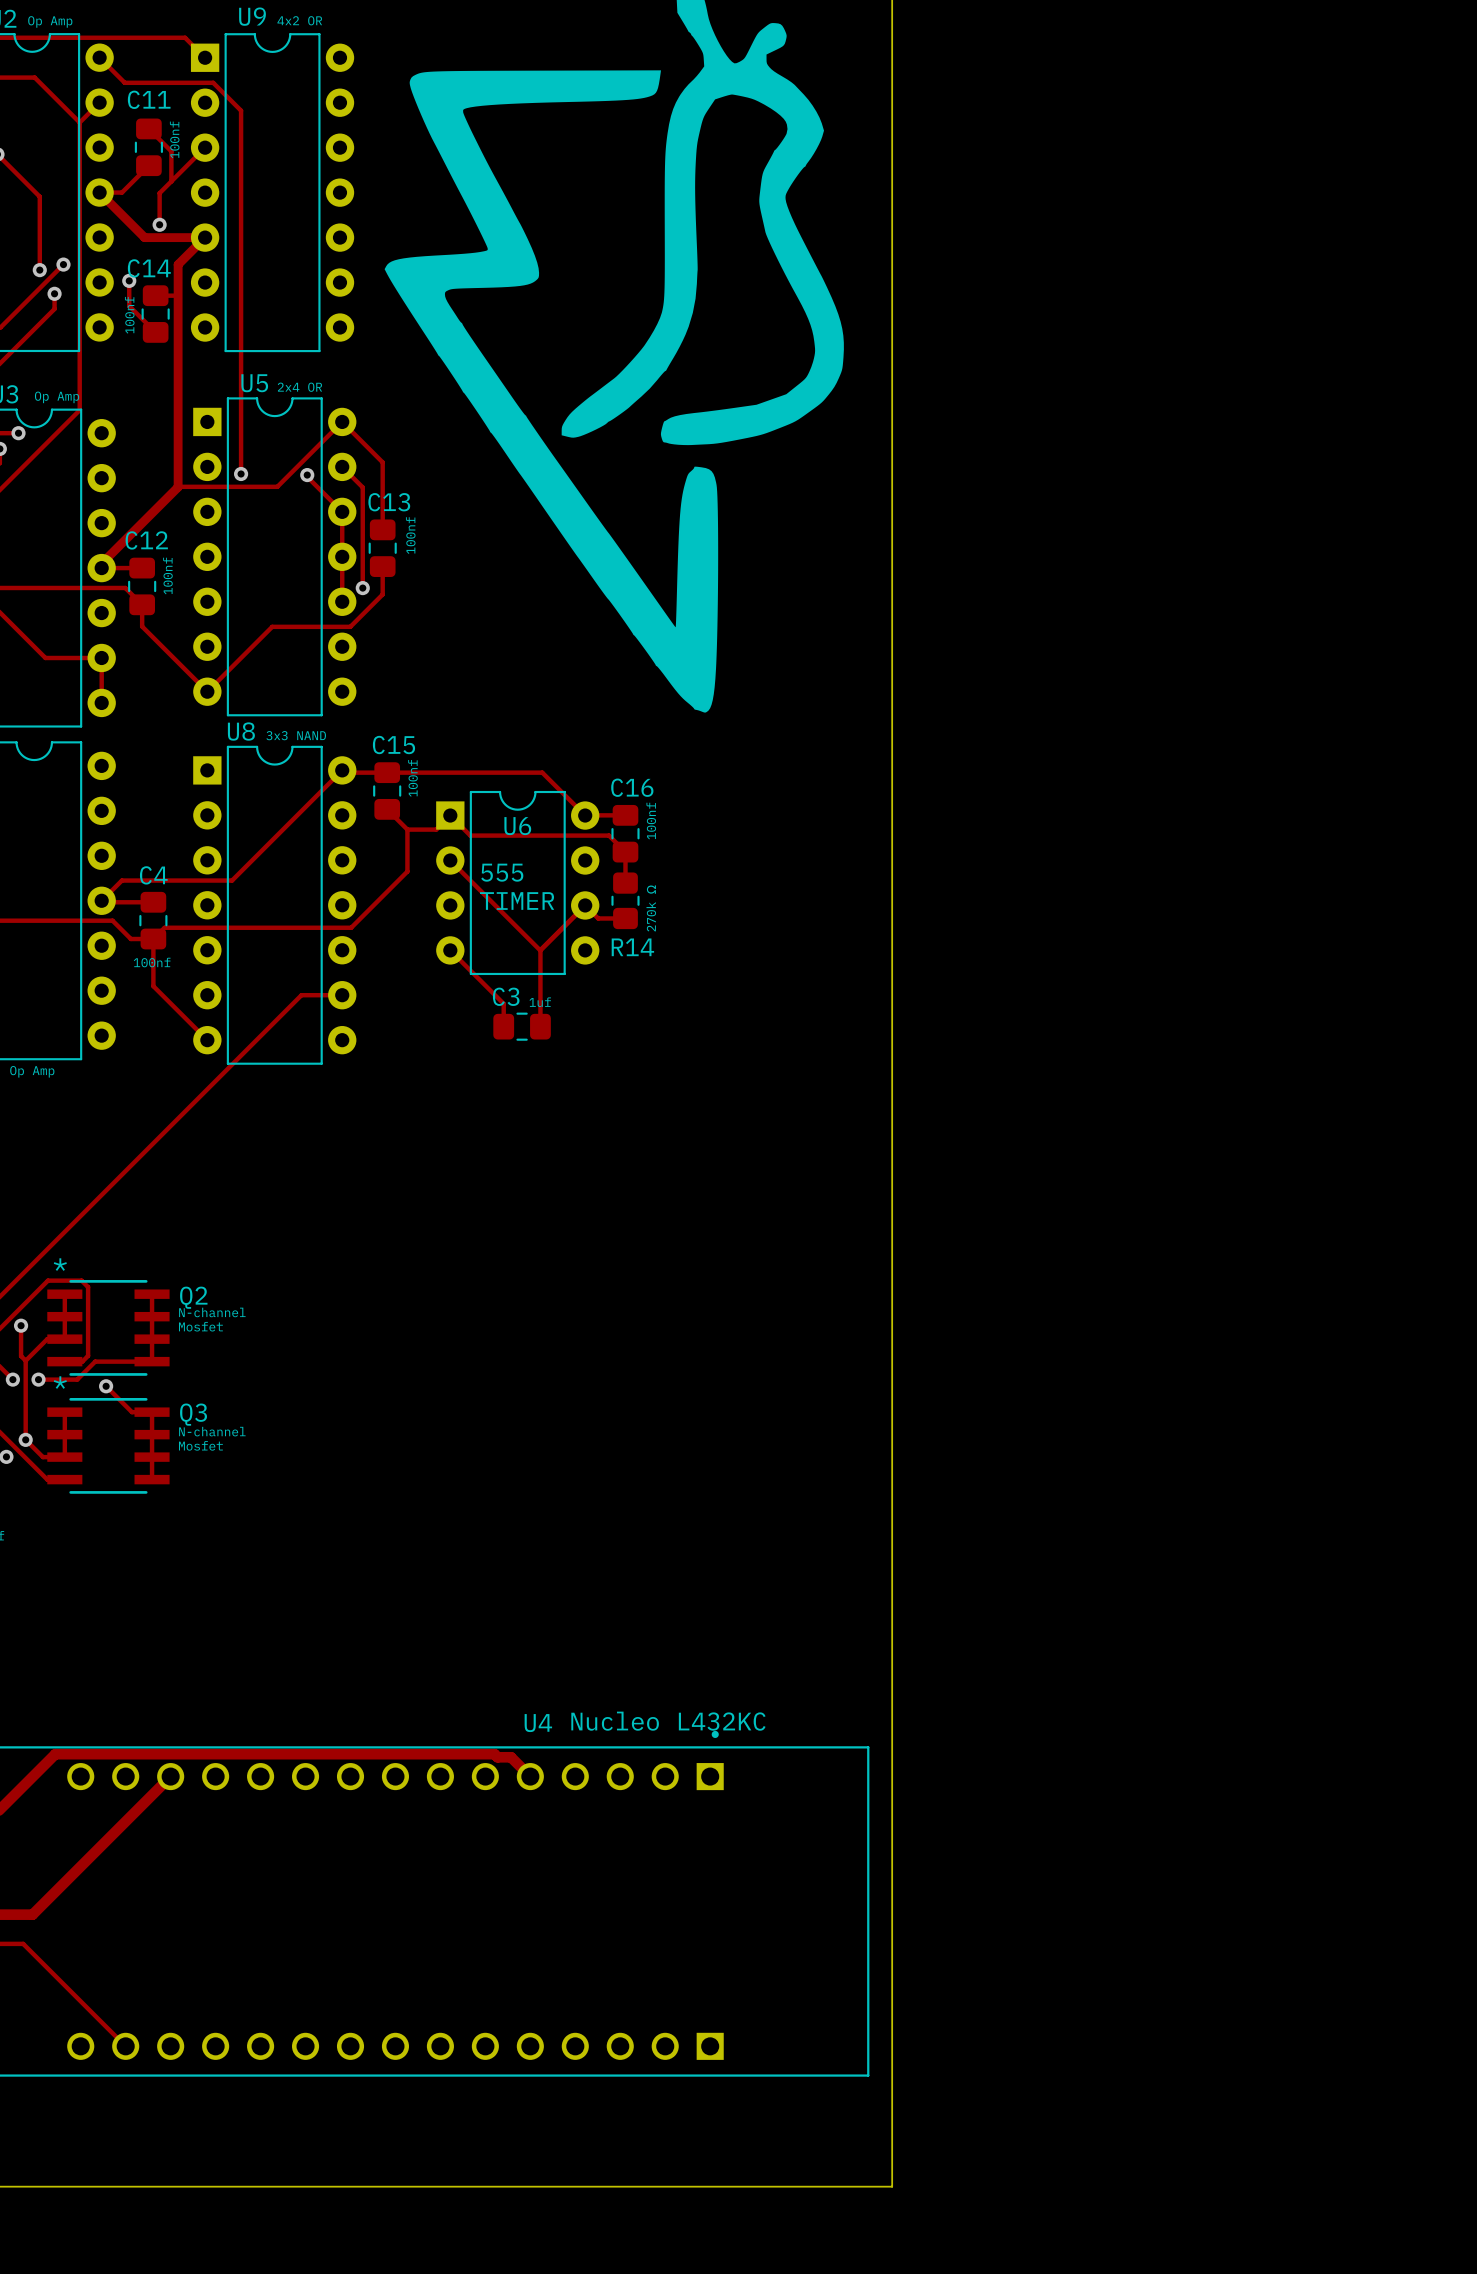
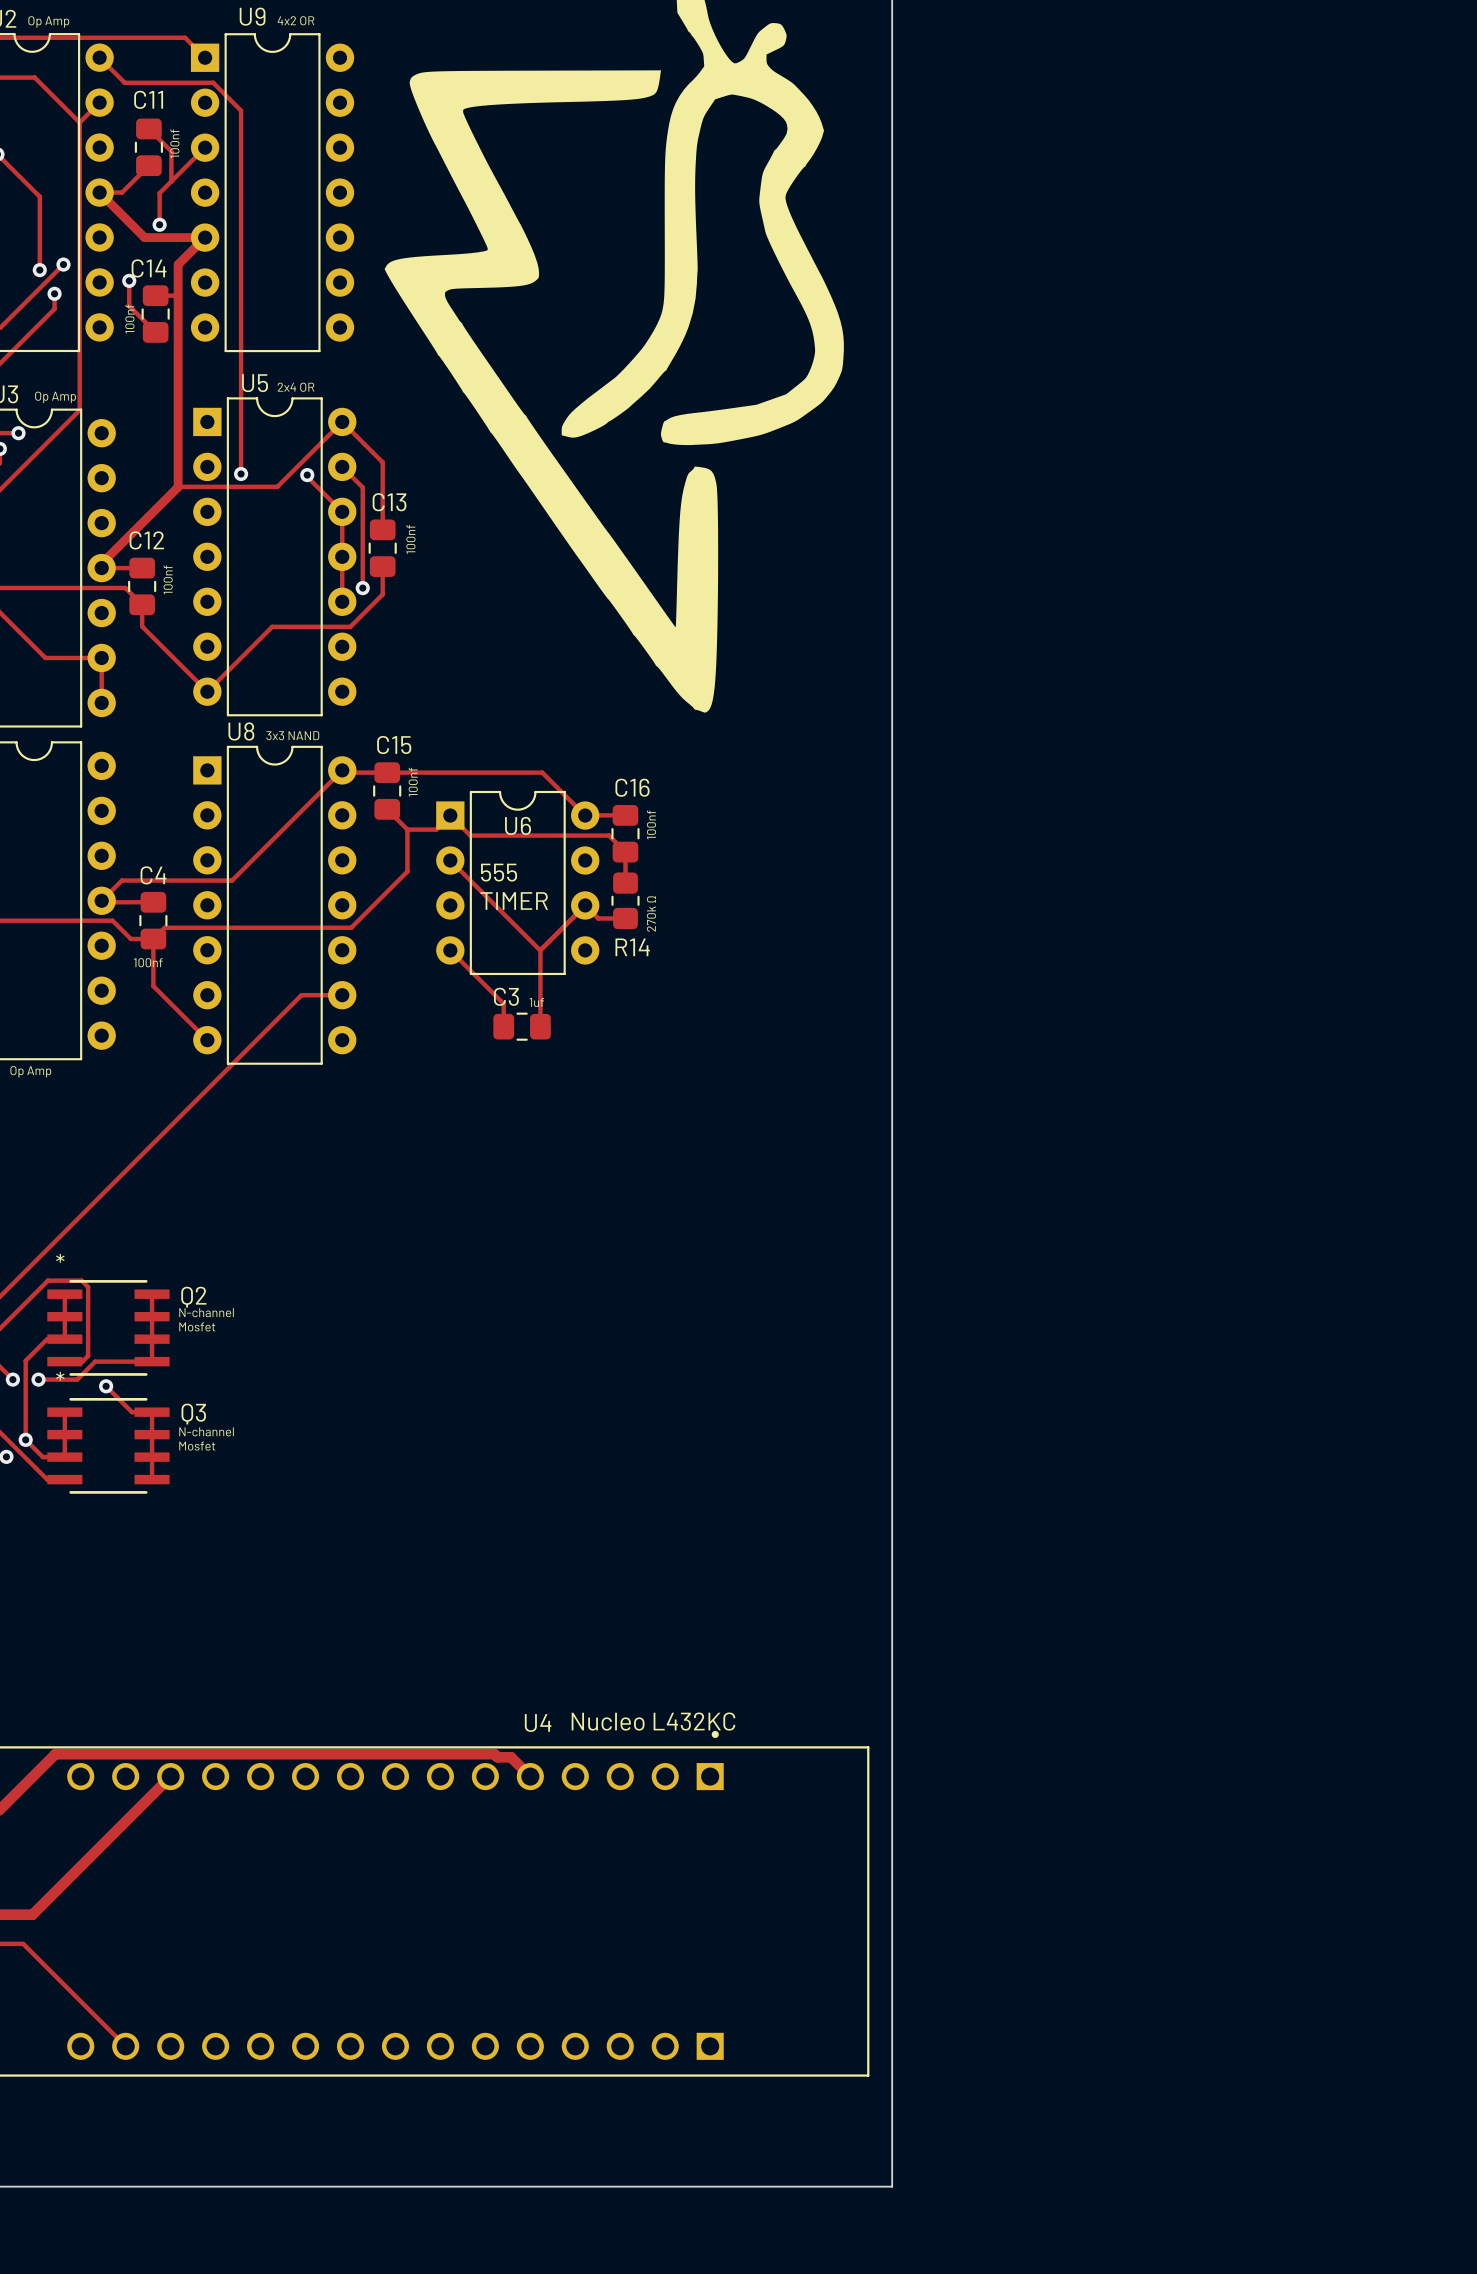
track: (21, 1325) (21, 1356) (25, 1360) -> none
via: (21, 1325) -> none

